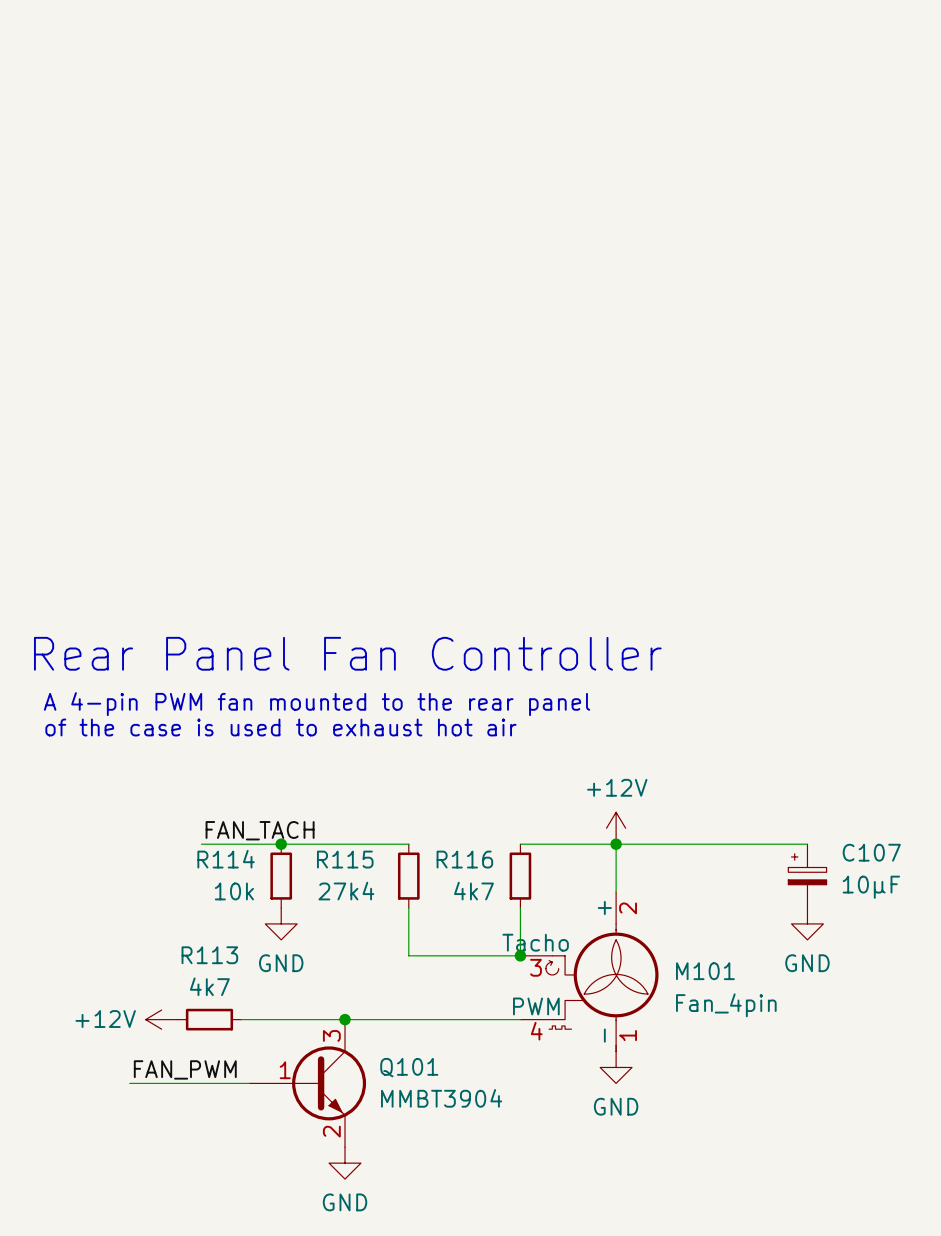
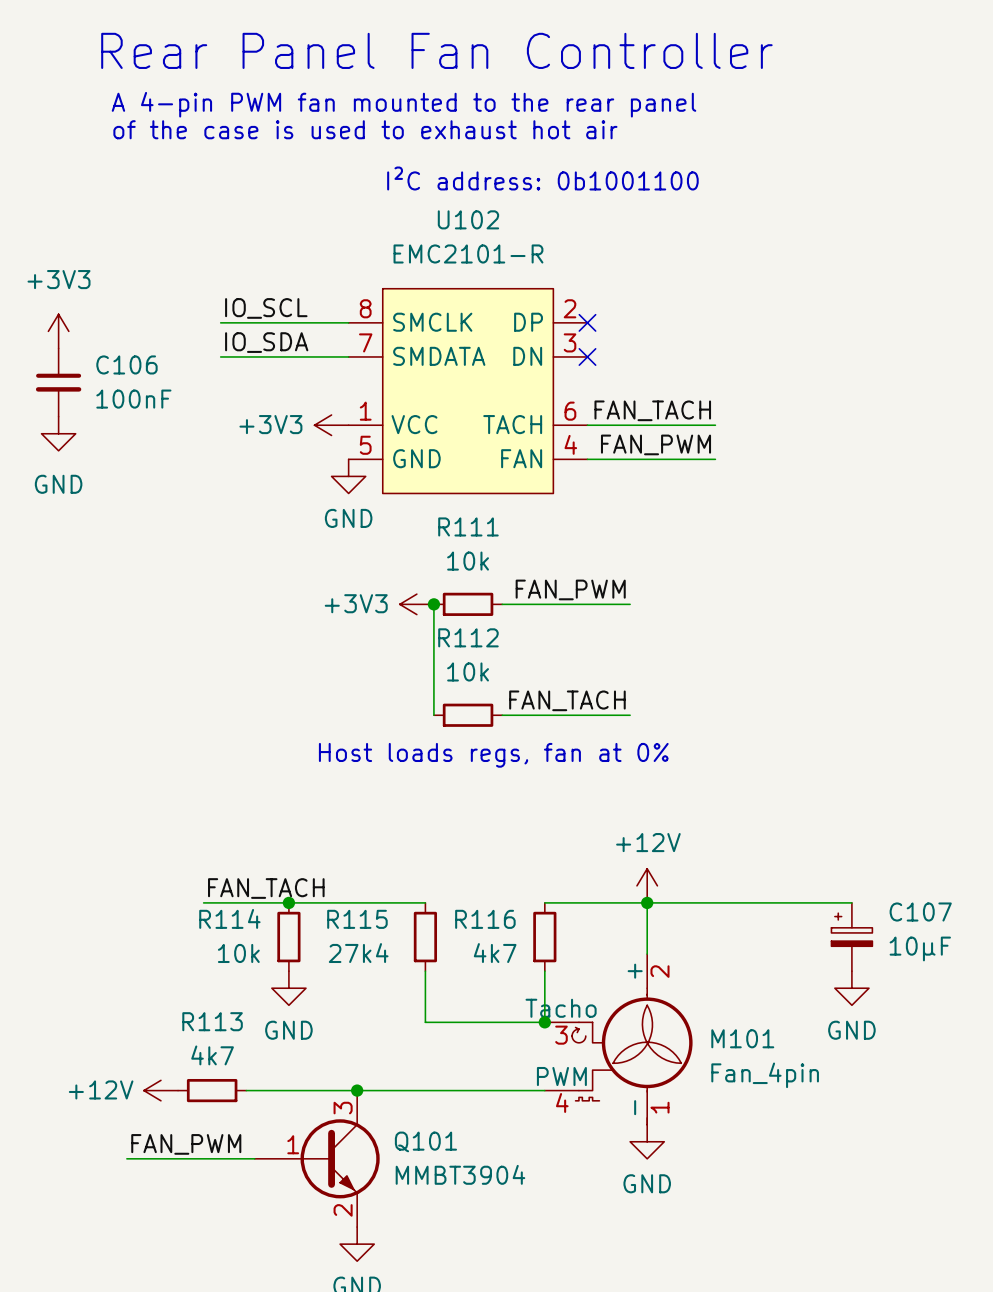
text: none -> Rear Panel Fan Controller (436, 50)
text: none -> A 4-pin PWM fan mounted to the rear panel (404, 104)
text: none -> of the case is used to exhaust hot air (365, 129)
text: none -> I²C address: 0b1001100 (542, 178)
label: none -> IO_SCL (266, 308)
wire: none -> (220, 322) (348, 322)
no-connect mark: none -> (587, 322)
power symbol: none -> +3V3 (58, 331)
label: none -> IO_SDA (266, 342)
wire: none -> (220, 356) (348, 356)
no-connect mark: none -> (587, 356)
C106: none -> 100nF (58, 382)
U102: none -> EMC2101-R (468, 391)
label: none -> FAN_TACH (652, 410)
power symbol: none -> +3V3 (331, 425)
wire: none -> (587, 425) (715, 425)
power symbol: none -> GND (58, 433)
label: none -> FAN_PWM (656, 444)
wire: none -> (587, 459) (715, 459)
power symbol: none -> GND (348, 476)
label: none -> FAN_PWM (570, 589)
power symbol: none -> +3V3 (416, 604)
wire: none -> (433, 604) (433, 715)
junction: none -> (433, 604)
R111: none -> 10k (468, 604)
wire: none -> (502, 604) (630, 604)
text: Rear Panel Fan Controller (347, 653) -> none
label: none -> FAN_TACH (567, 700)
R112: none -> 10k (468, 715)
wire: none -> (502, 715) (630, 715)
text: A 4-pin PWM fan mounted to the rear panel (317, 704) -> none
text: none -> Host loads regs, fan at 0% (493, 755)
text: of the case is used to exhaust hot air (280, 727) -> none

